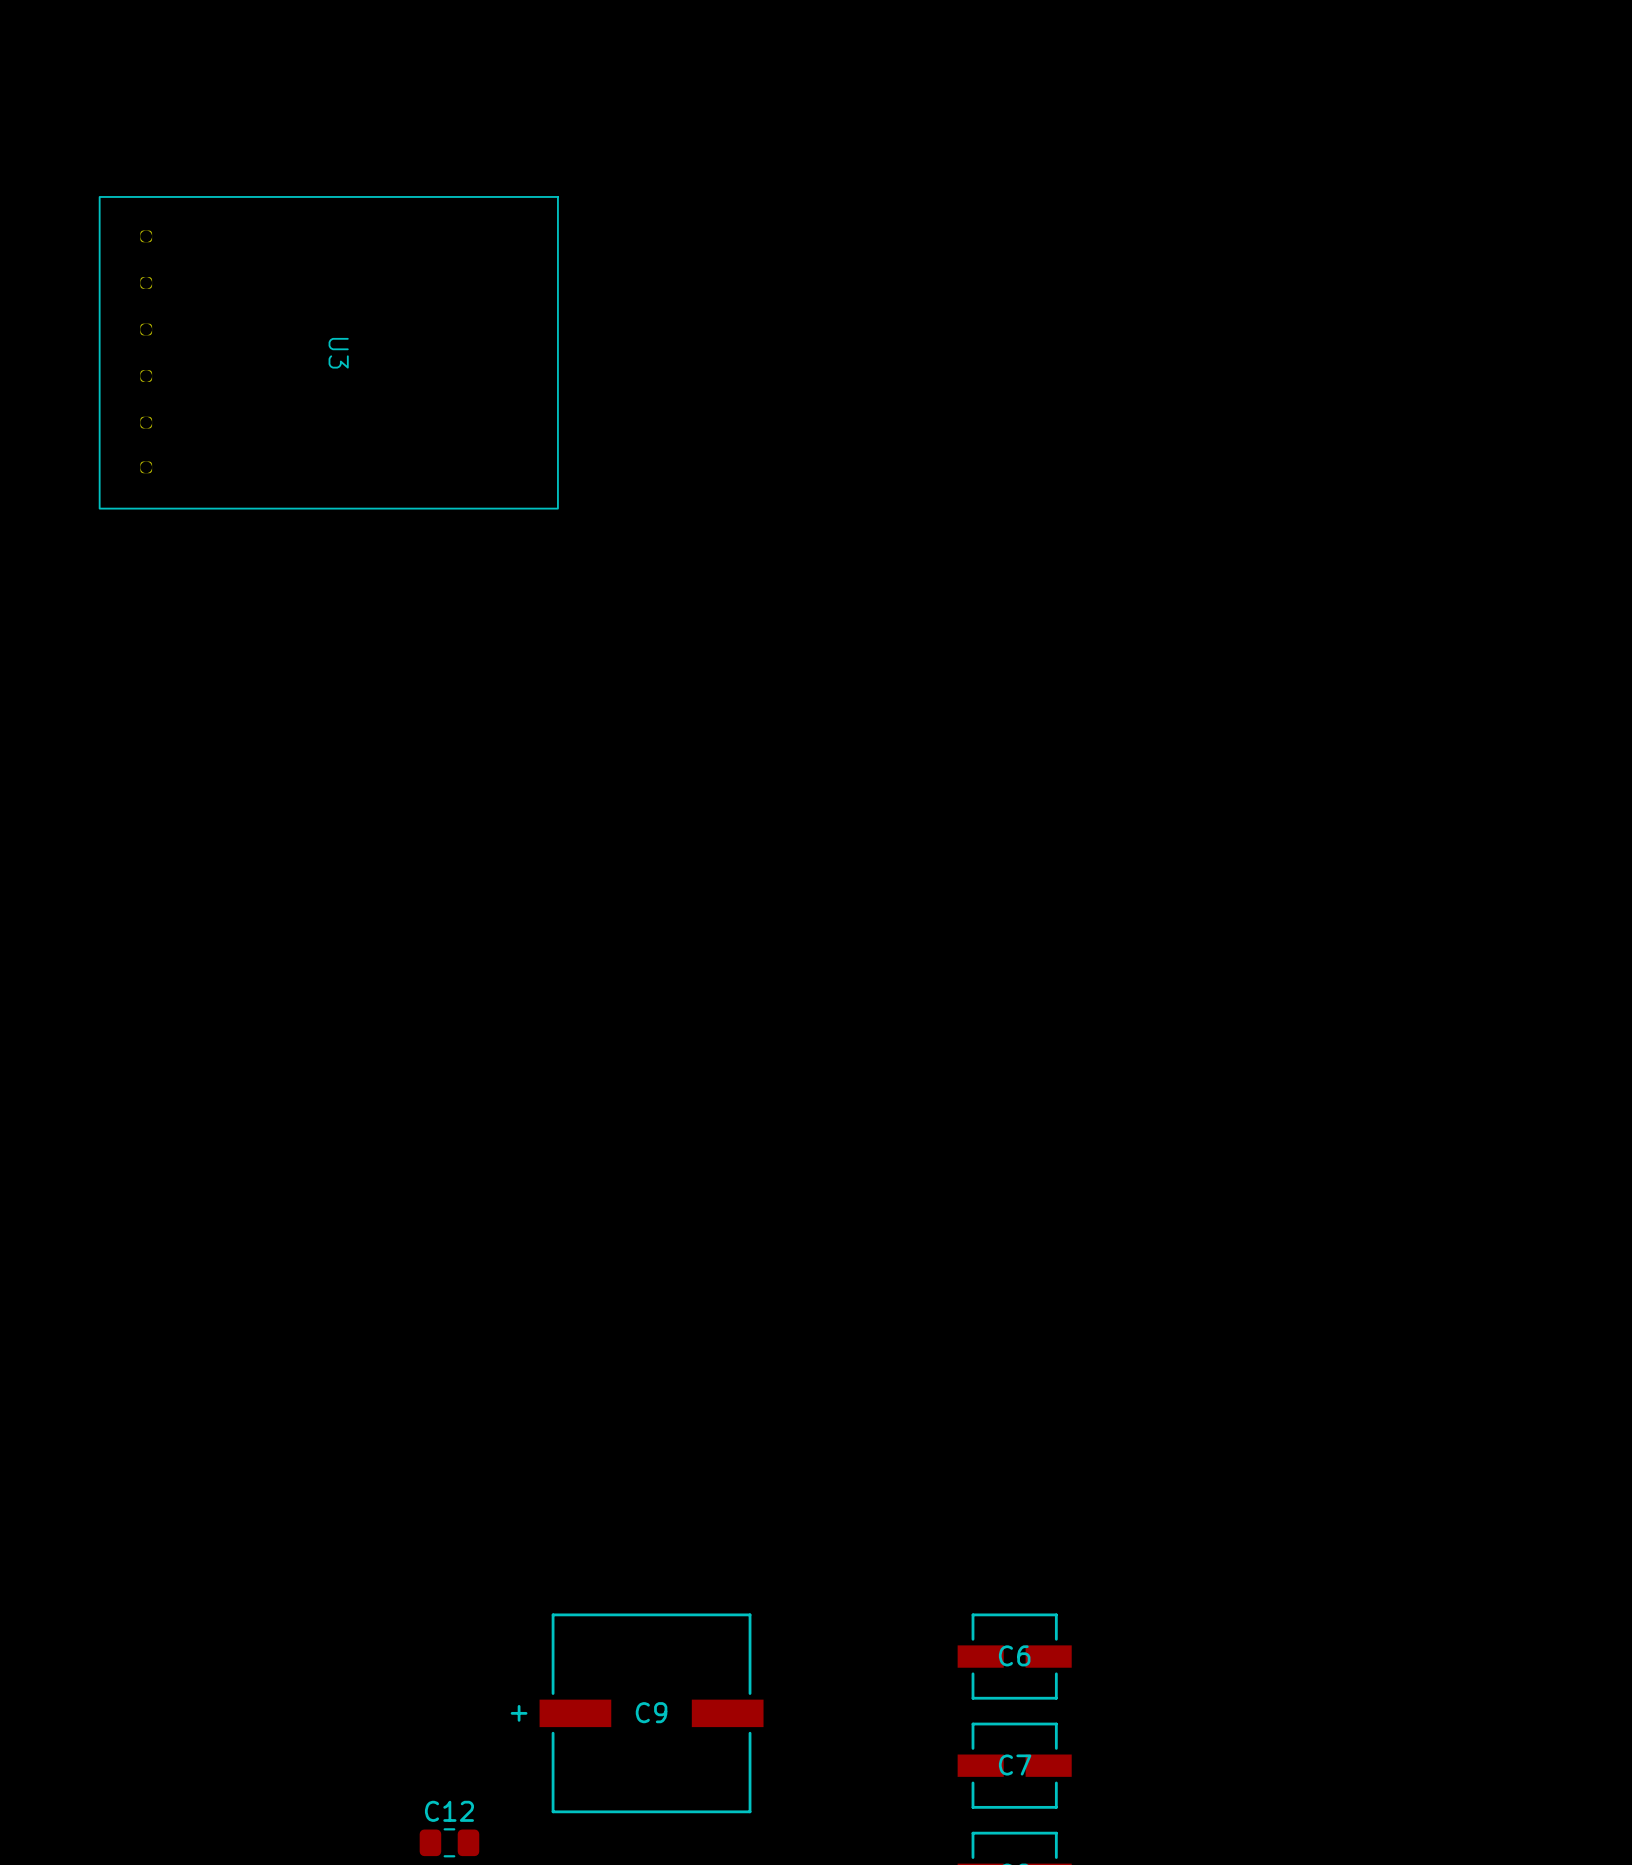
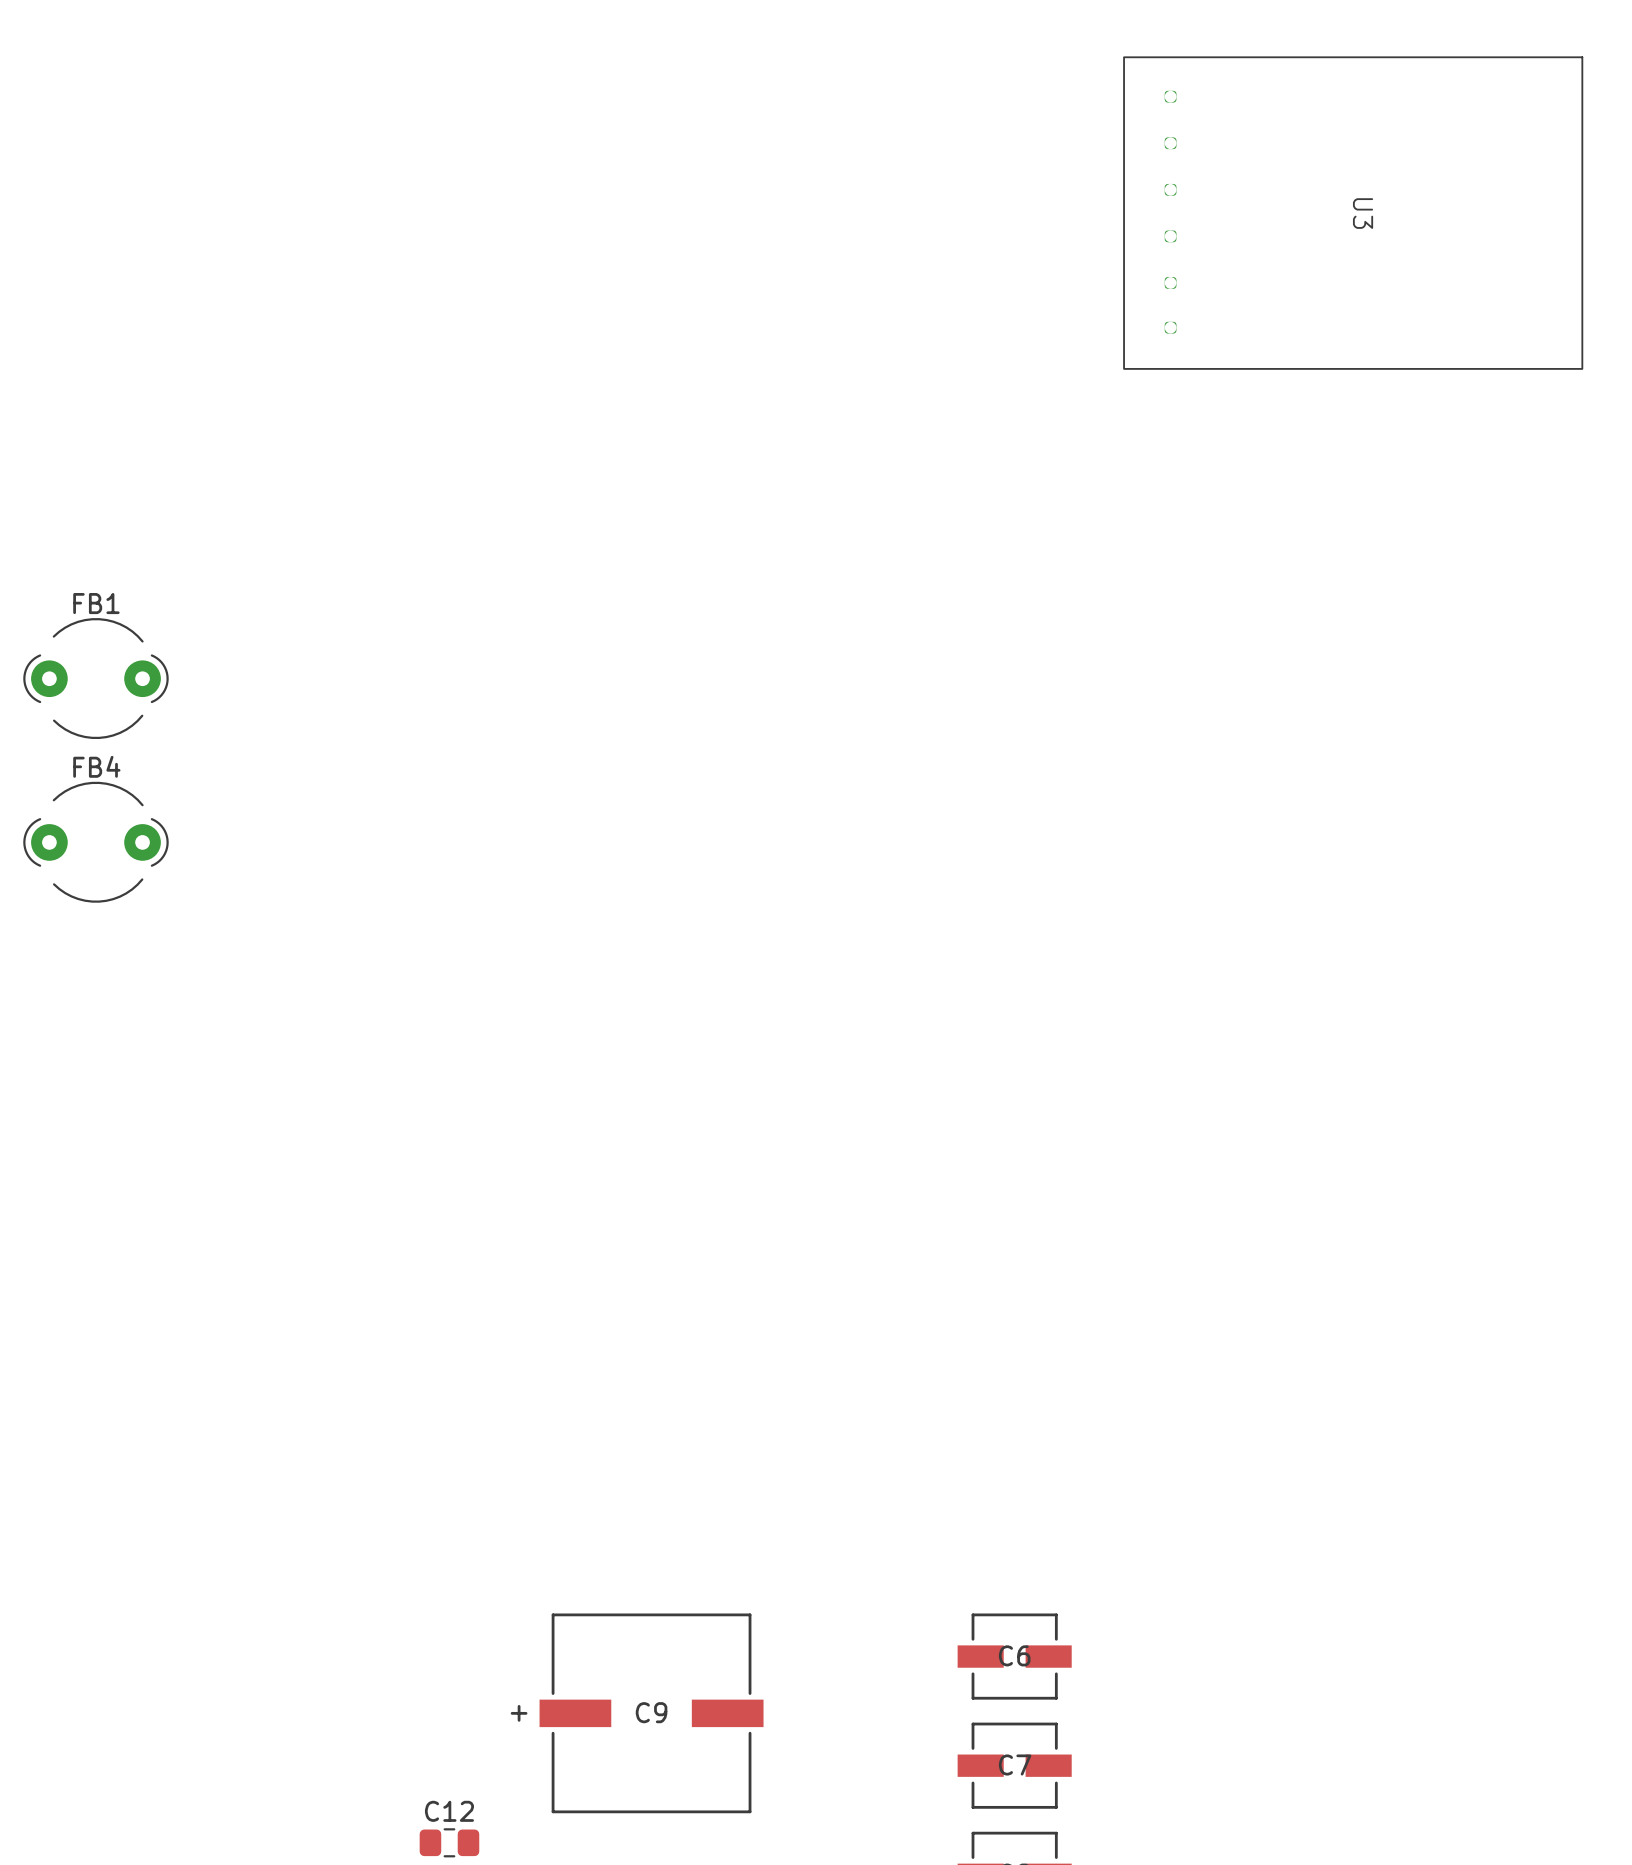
U3 position: (328, 352) -> (1353, 213)
FB1: none -> (95, 678)
FB4: none -> (95, 842)

